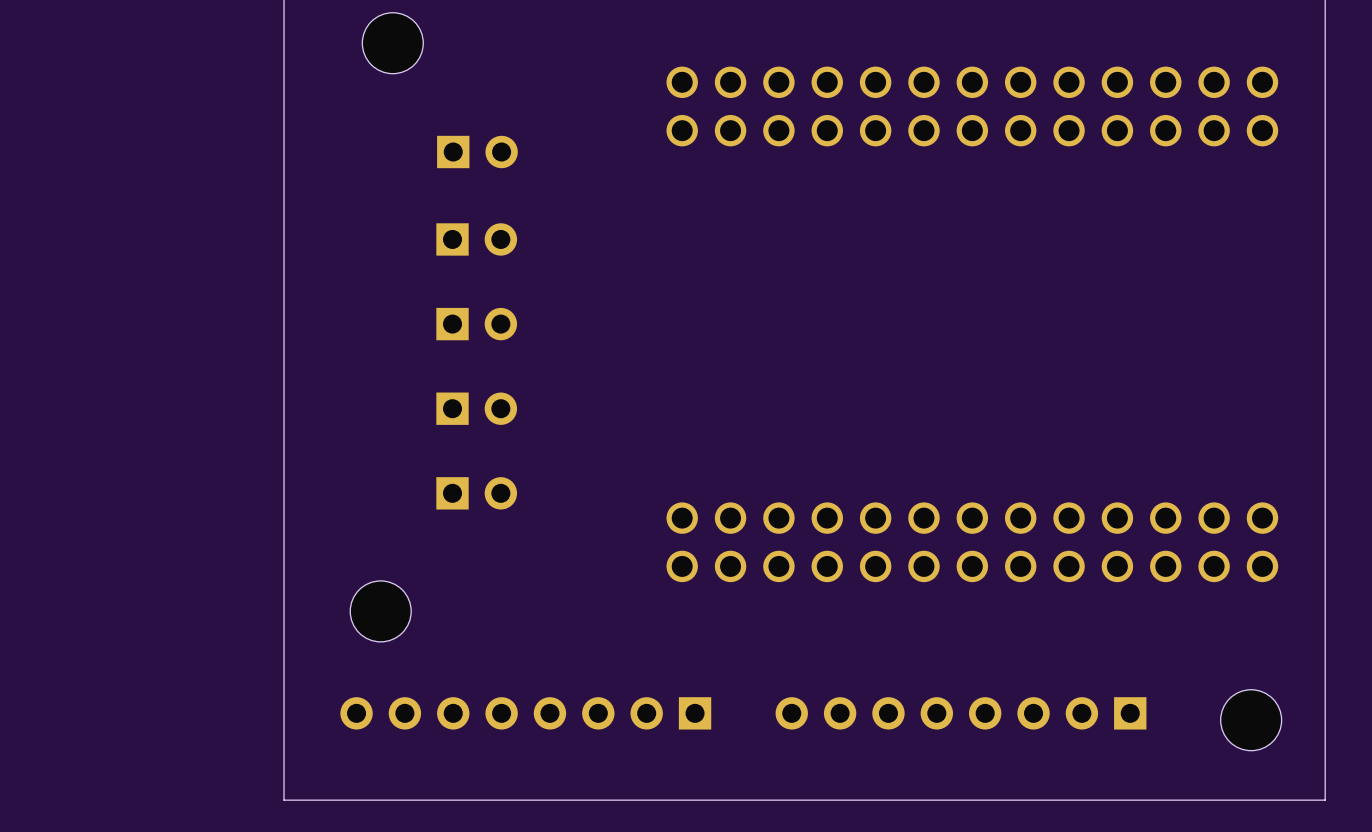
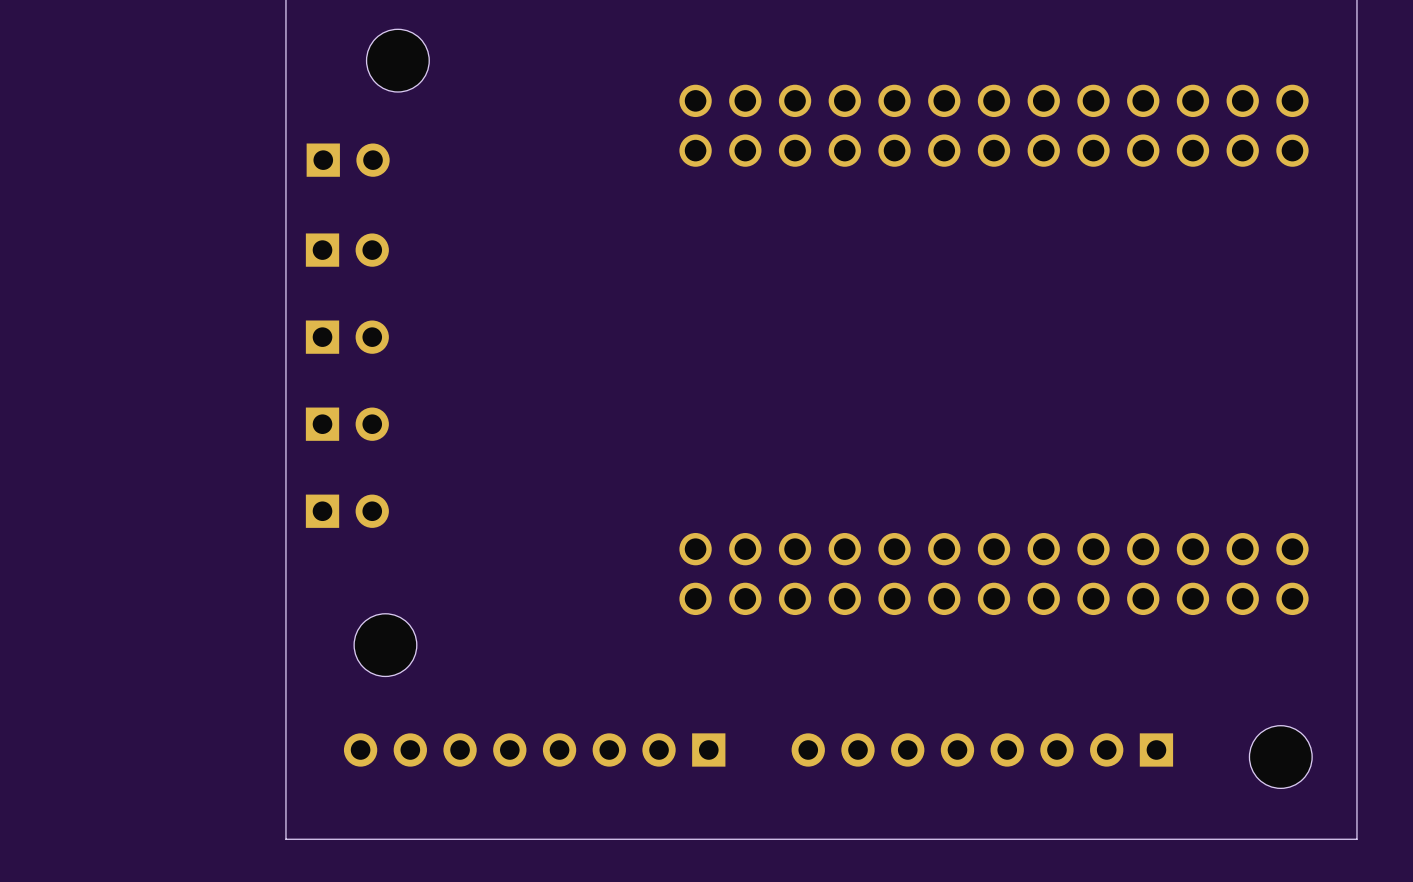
part: none -> (348, 160)
part: (477, 152) -> none
part: none -> (347, 250)
part: (476, 239) -> none
part: none -> (347, 337)
part: (476, 324) -> none
part: none -> (347, 424)
part: (476, 408) -> none
part: none -> (347, 511)
part: (476, 493) -> none

